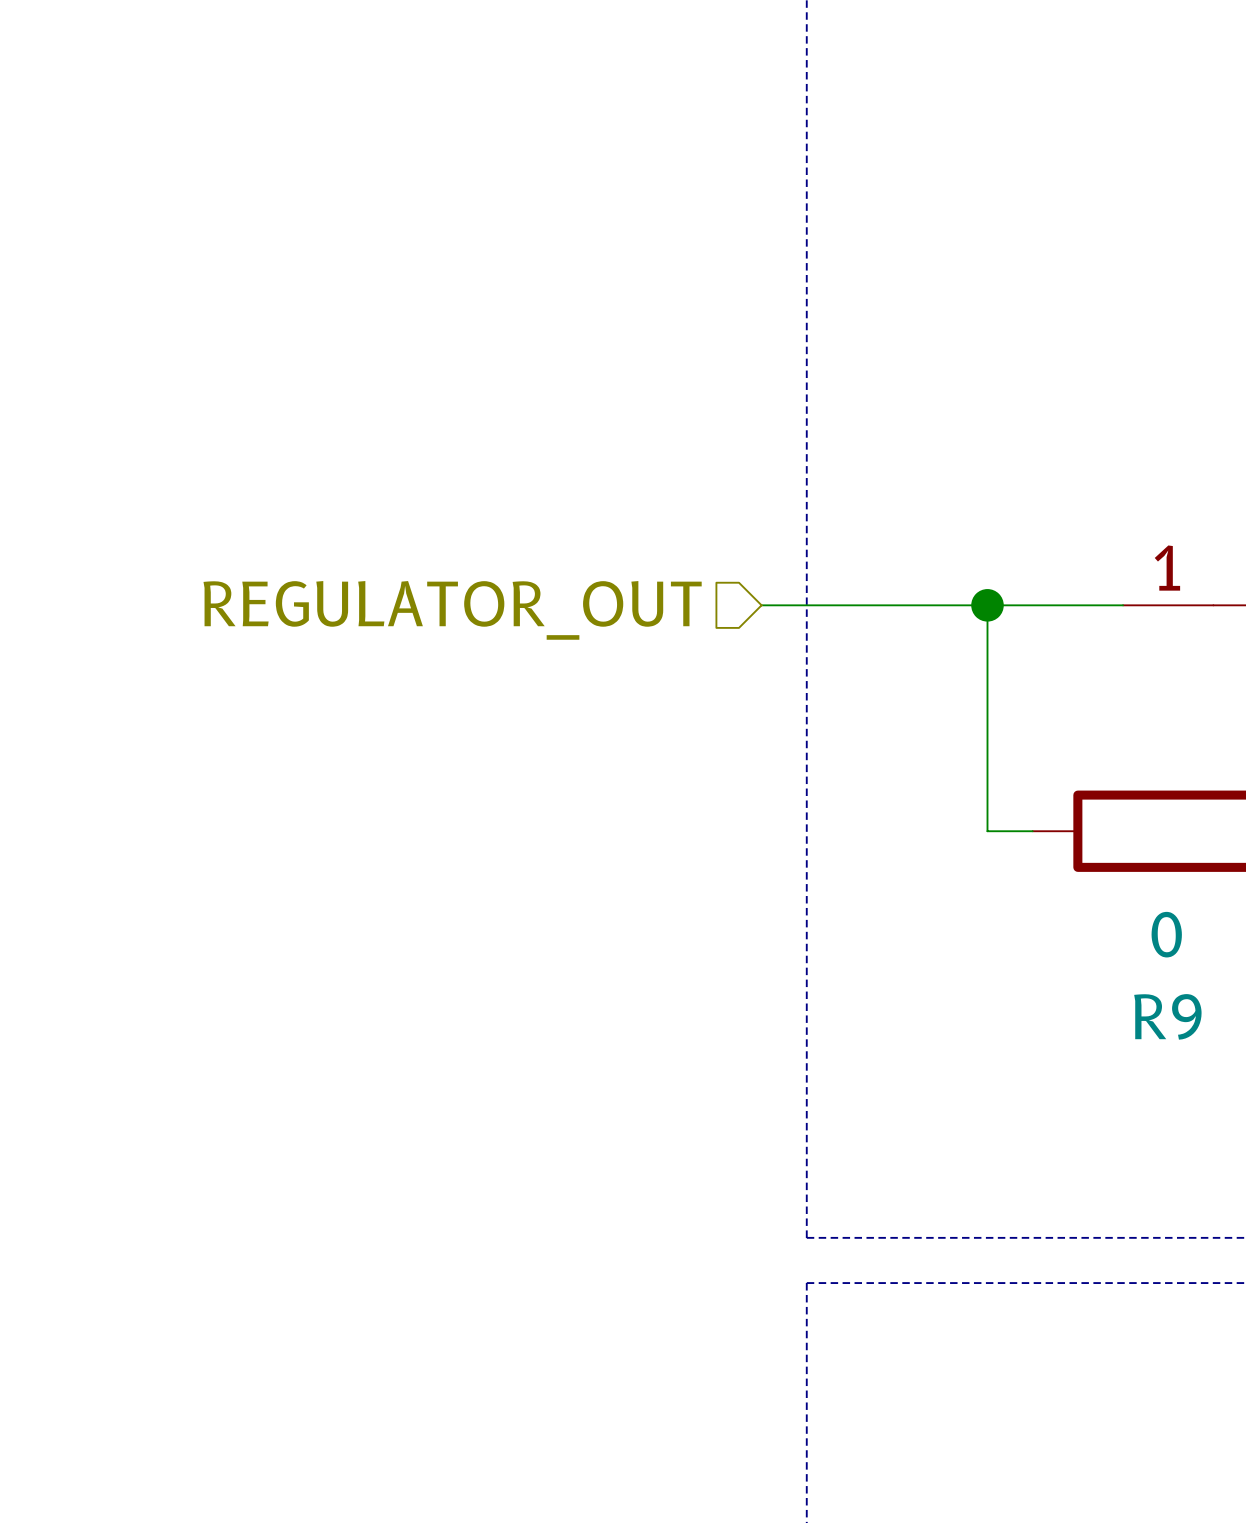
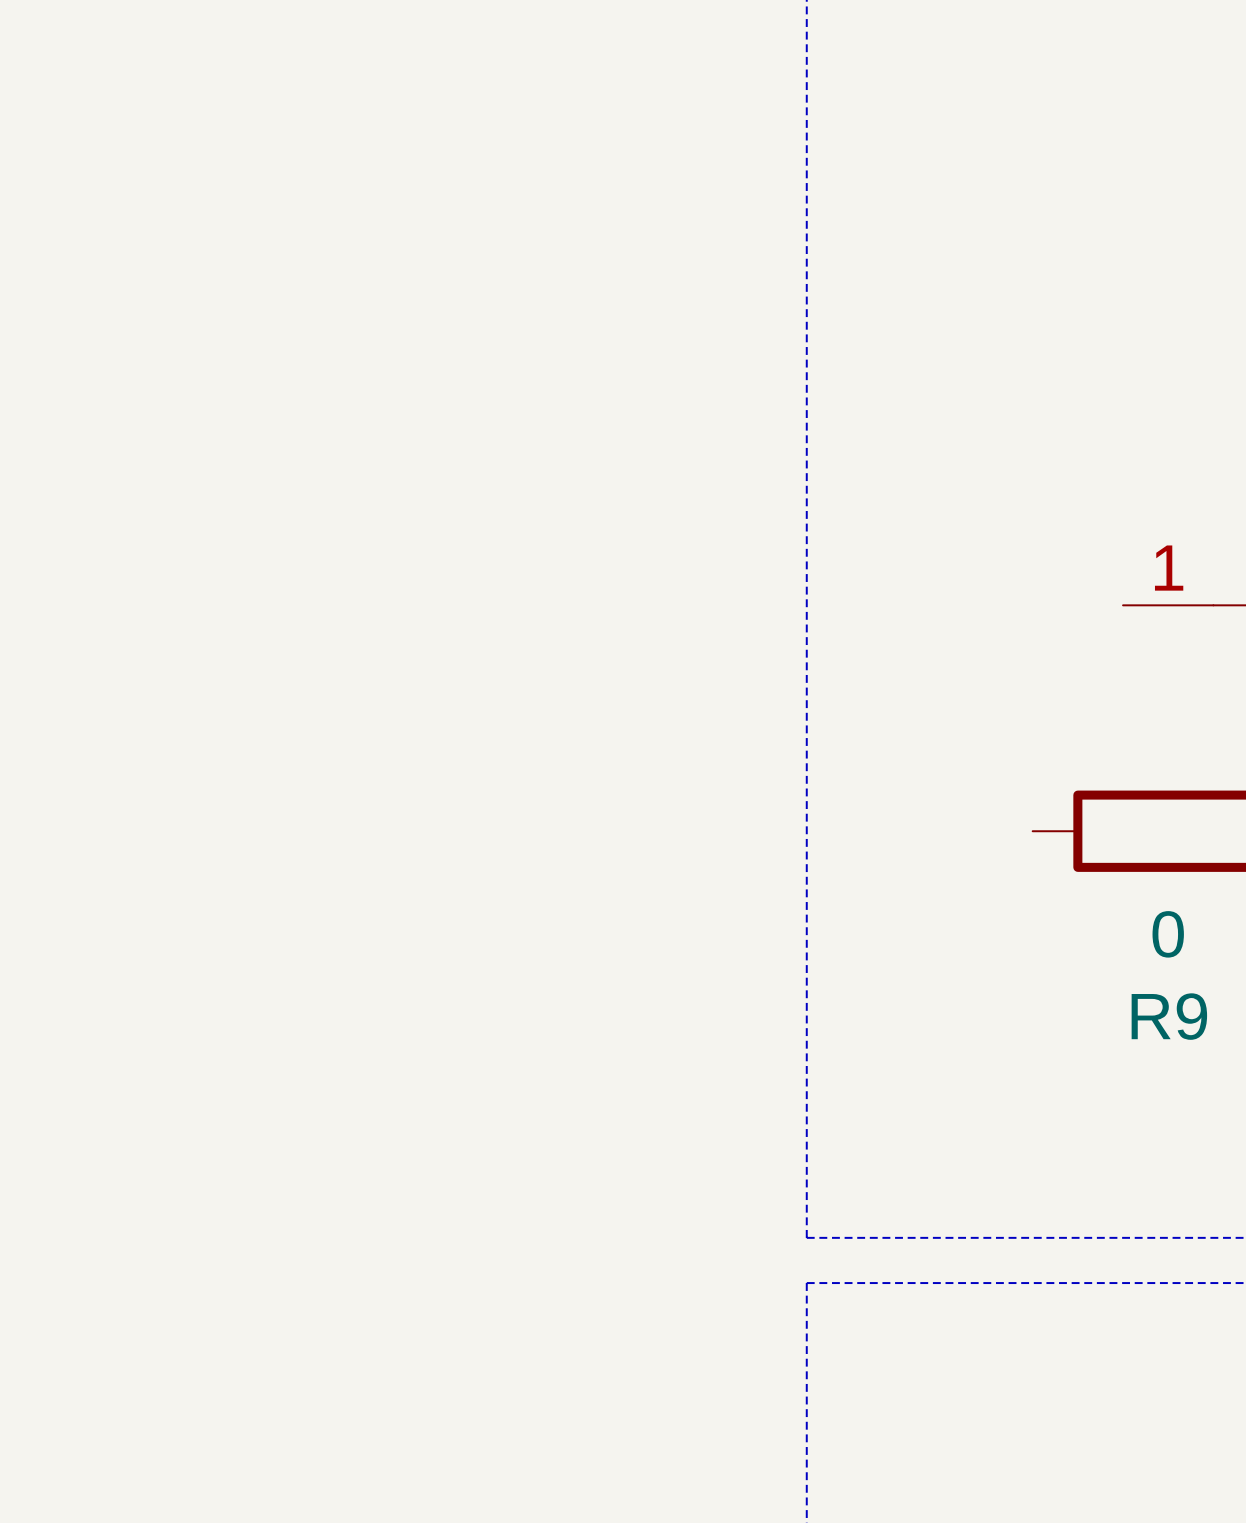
wire: (761, 605) (1123, 605) -> none
wire: (987, 605) (987, 831) (1032, 831) -> none
junction: (987, 605) -> none
hierarchical label: REGULATOR_OUT (452, 610) -> none

